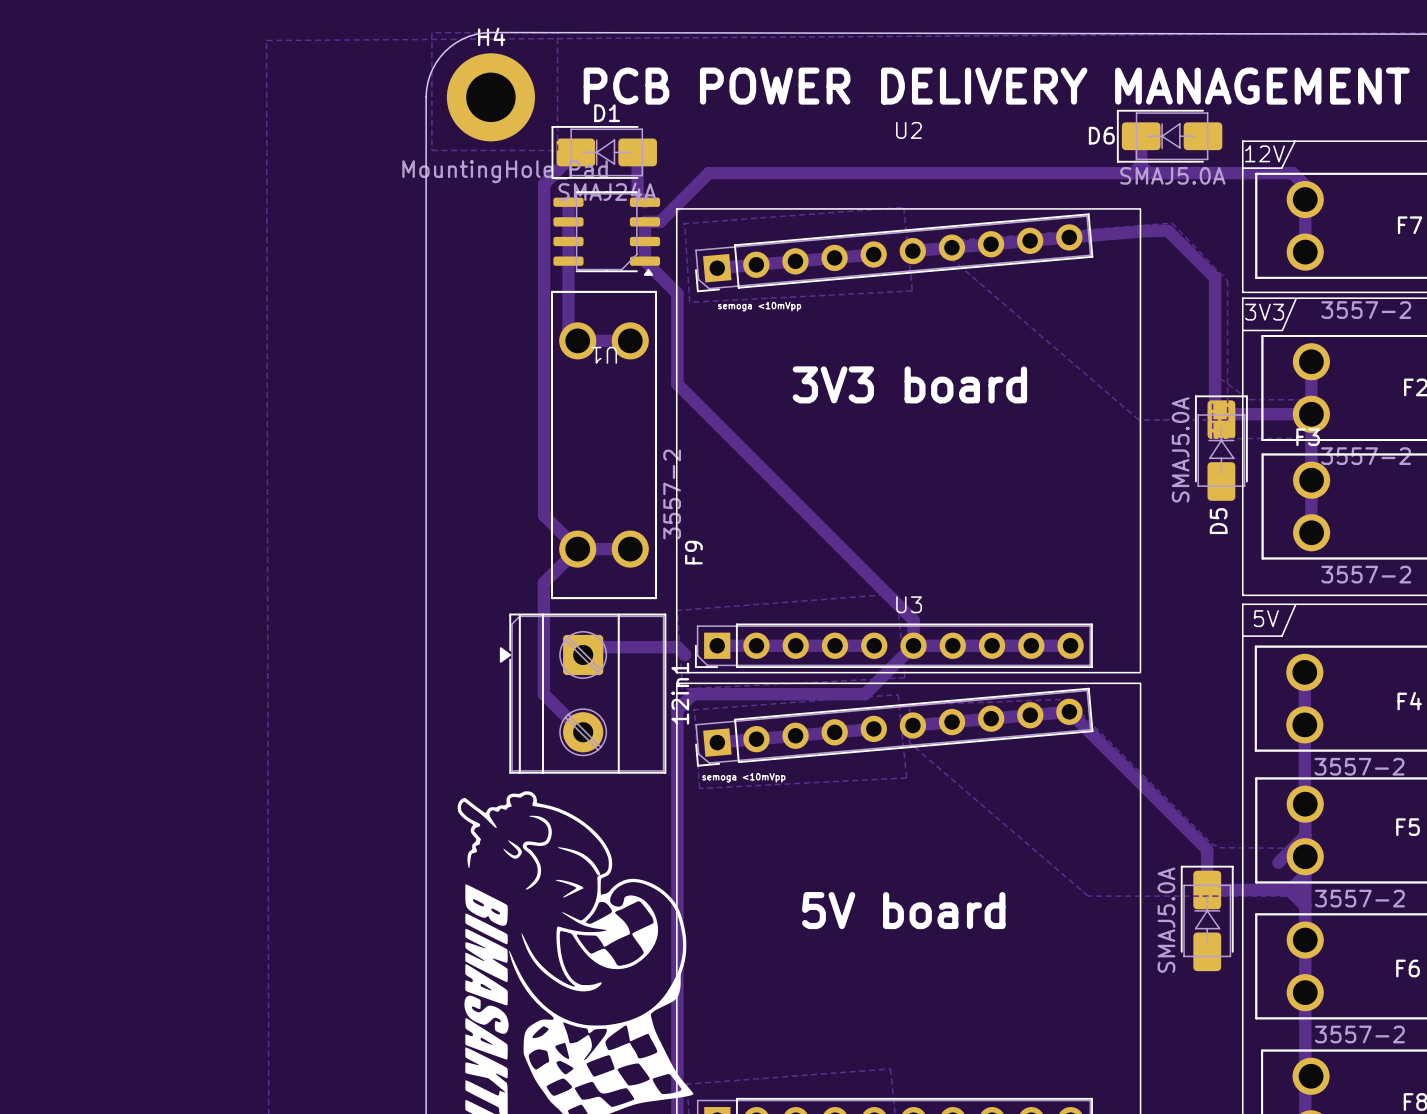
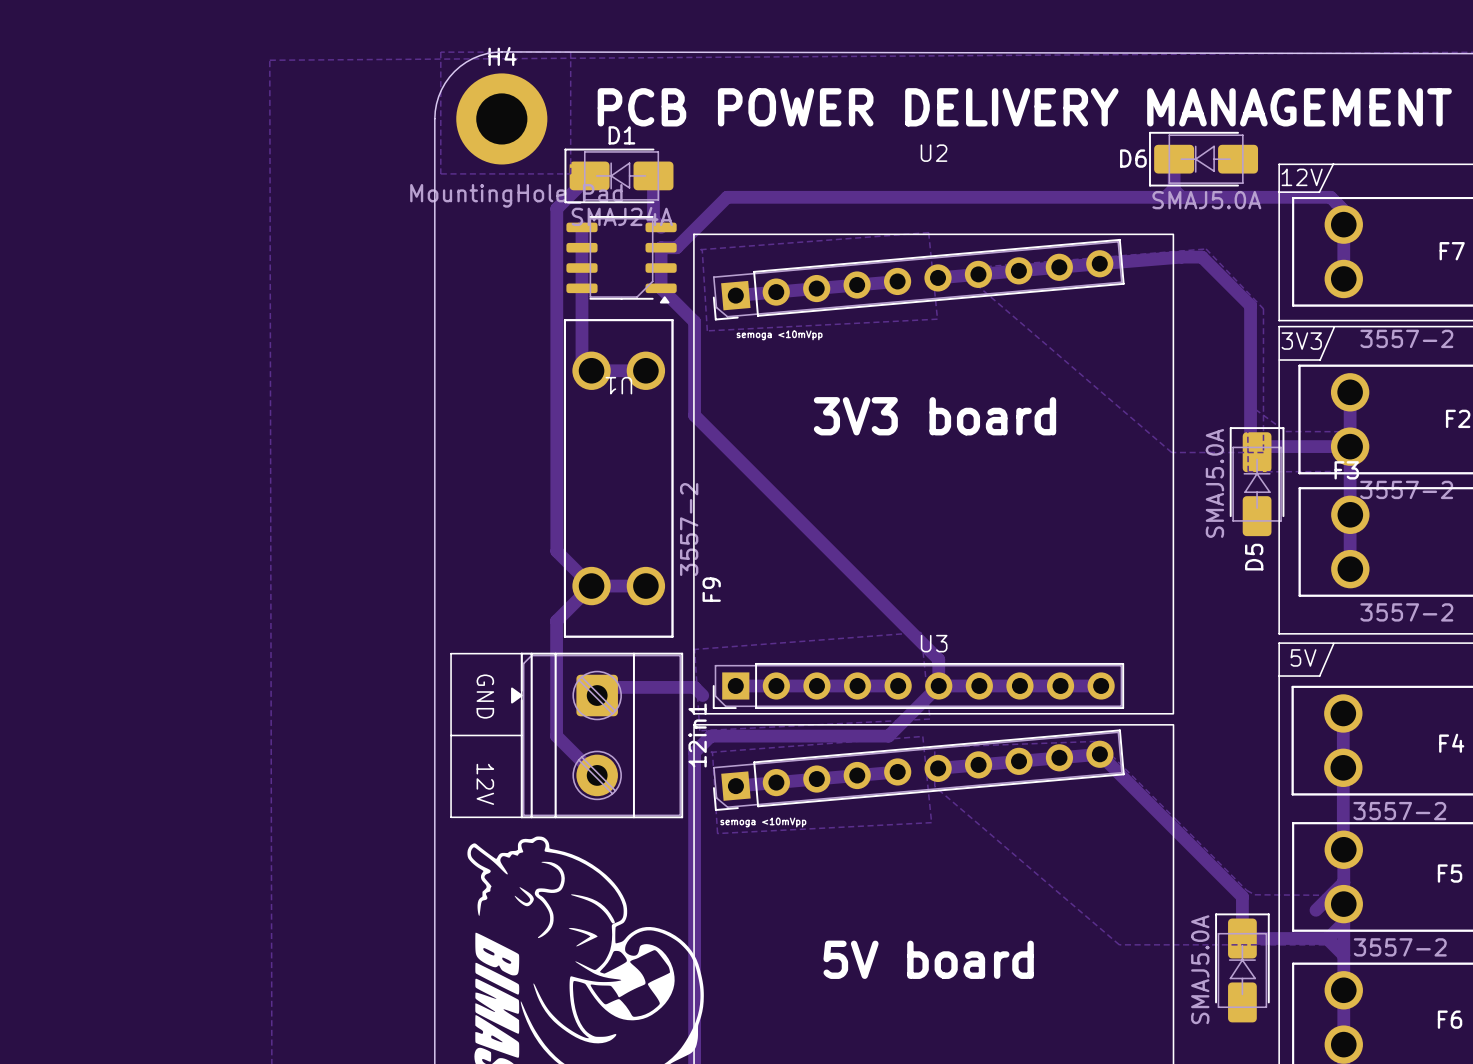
line: none -> (451, 653) (521, 653) (521, 817) (451, 817) (451, 653)
text: none -> GND (485, 696)
line: none -> (451, 735) (521, 735)
text: none -> 12V (485, 784)

